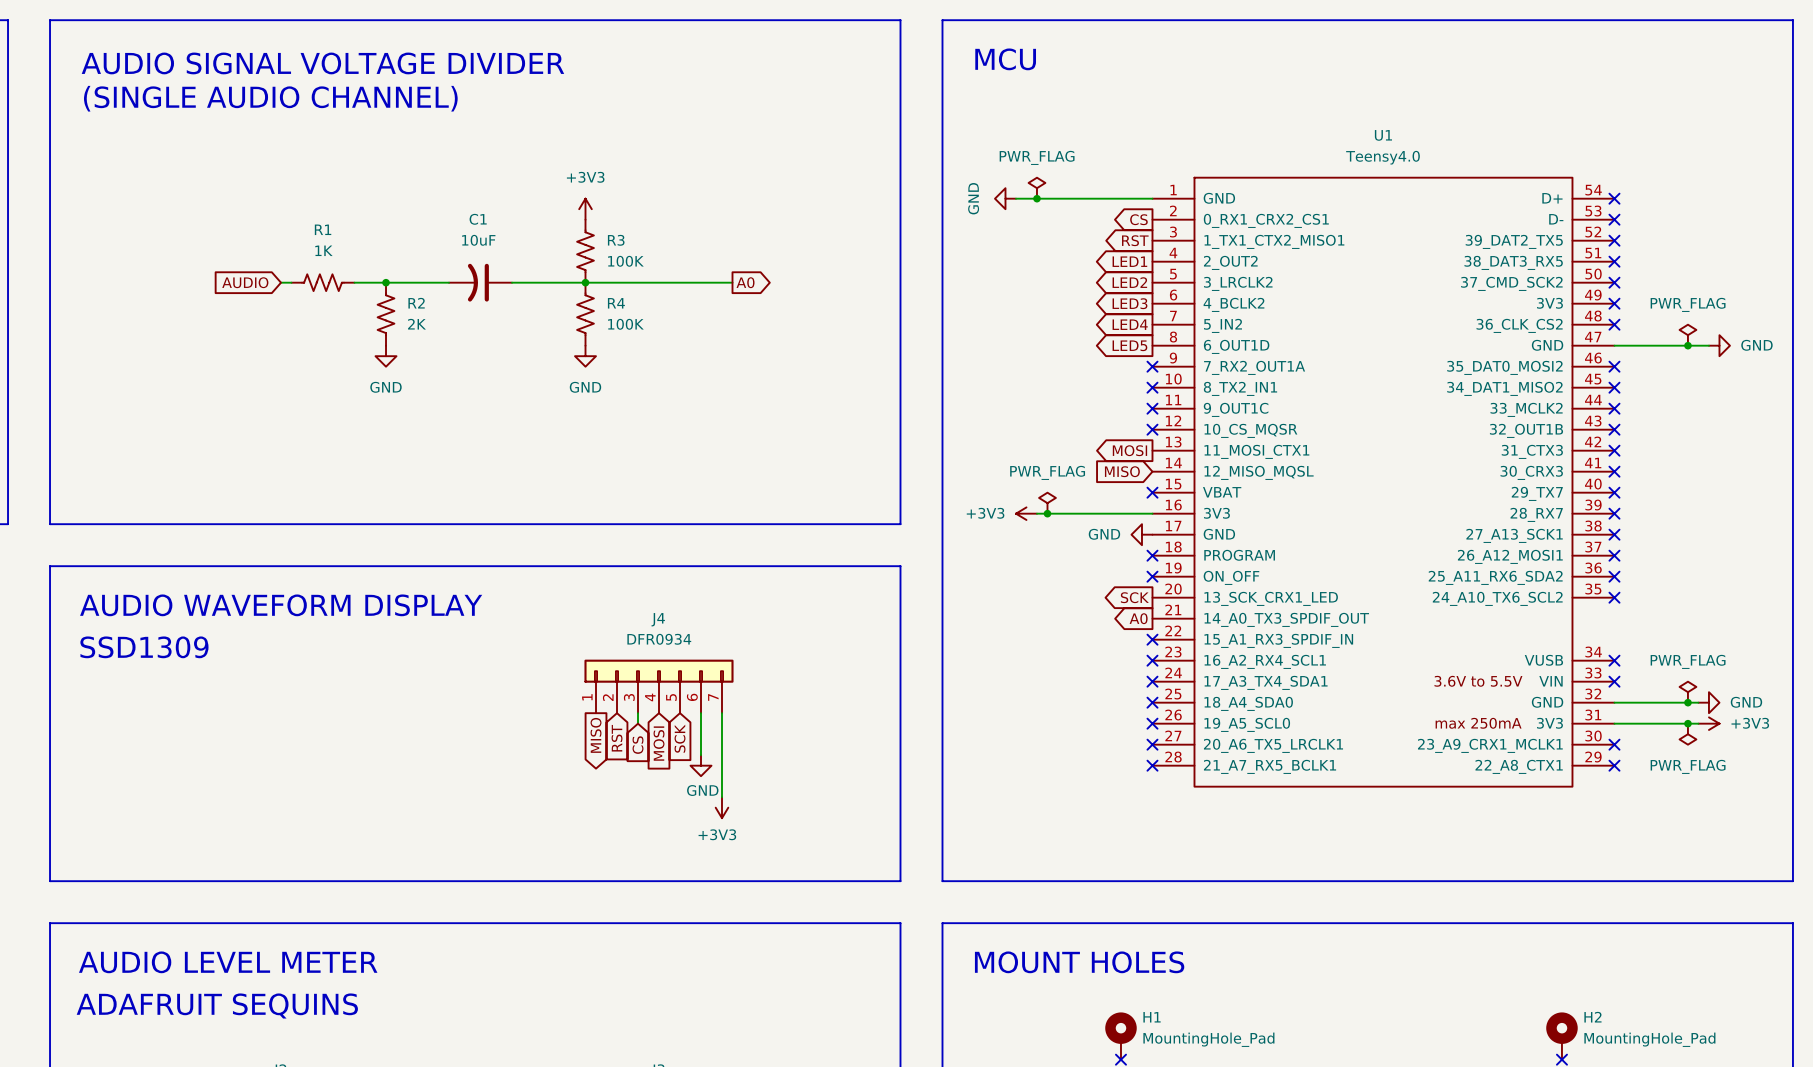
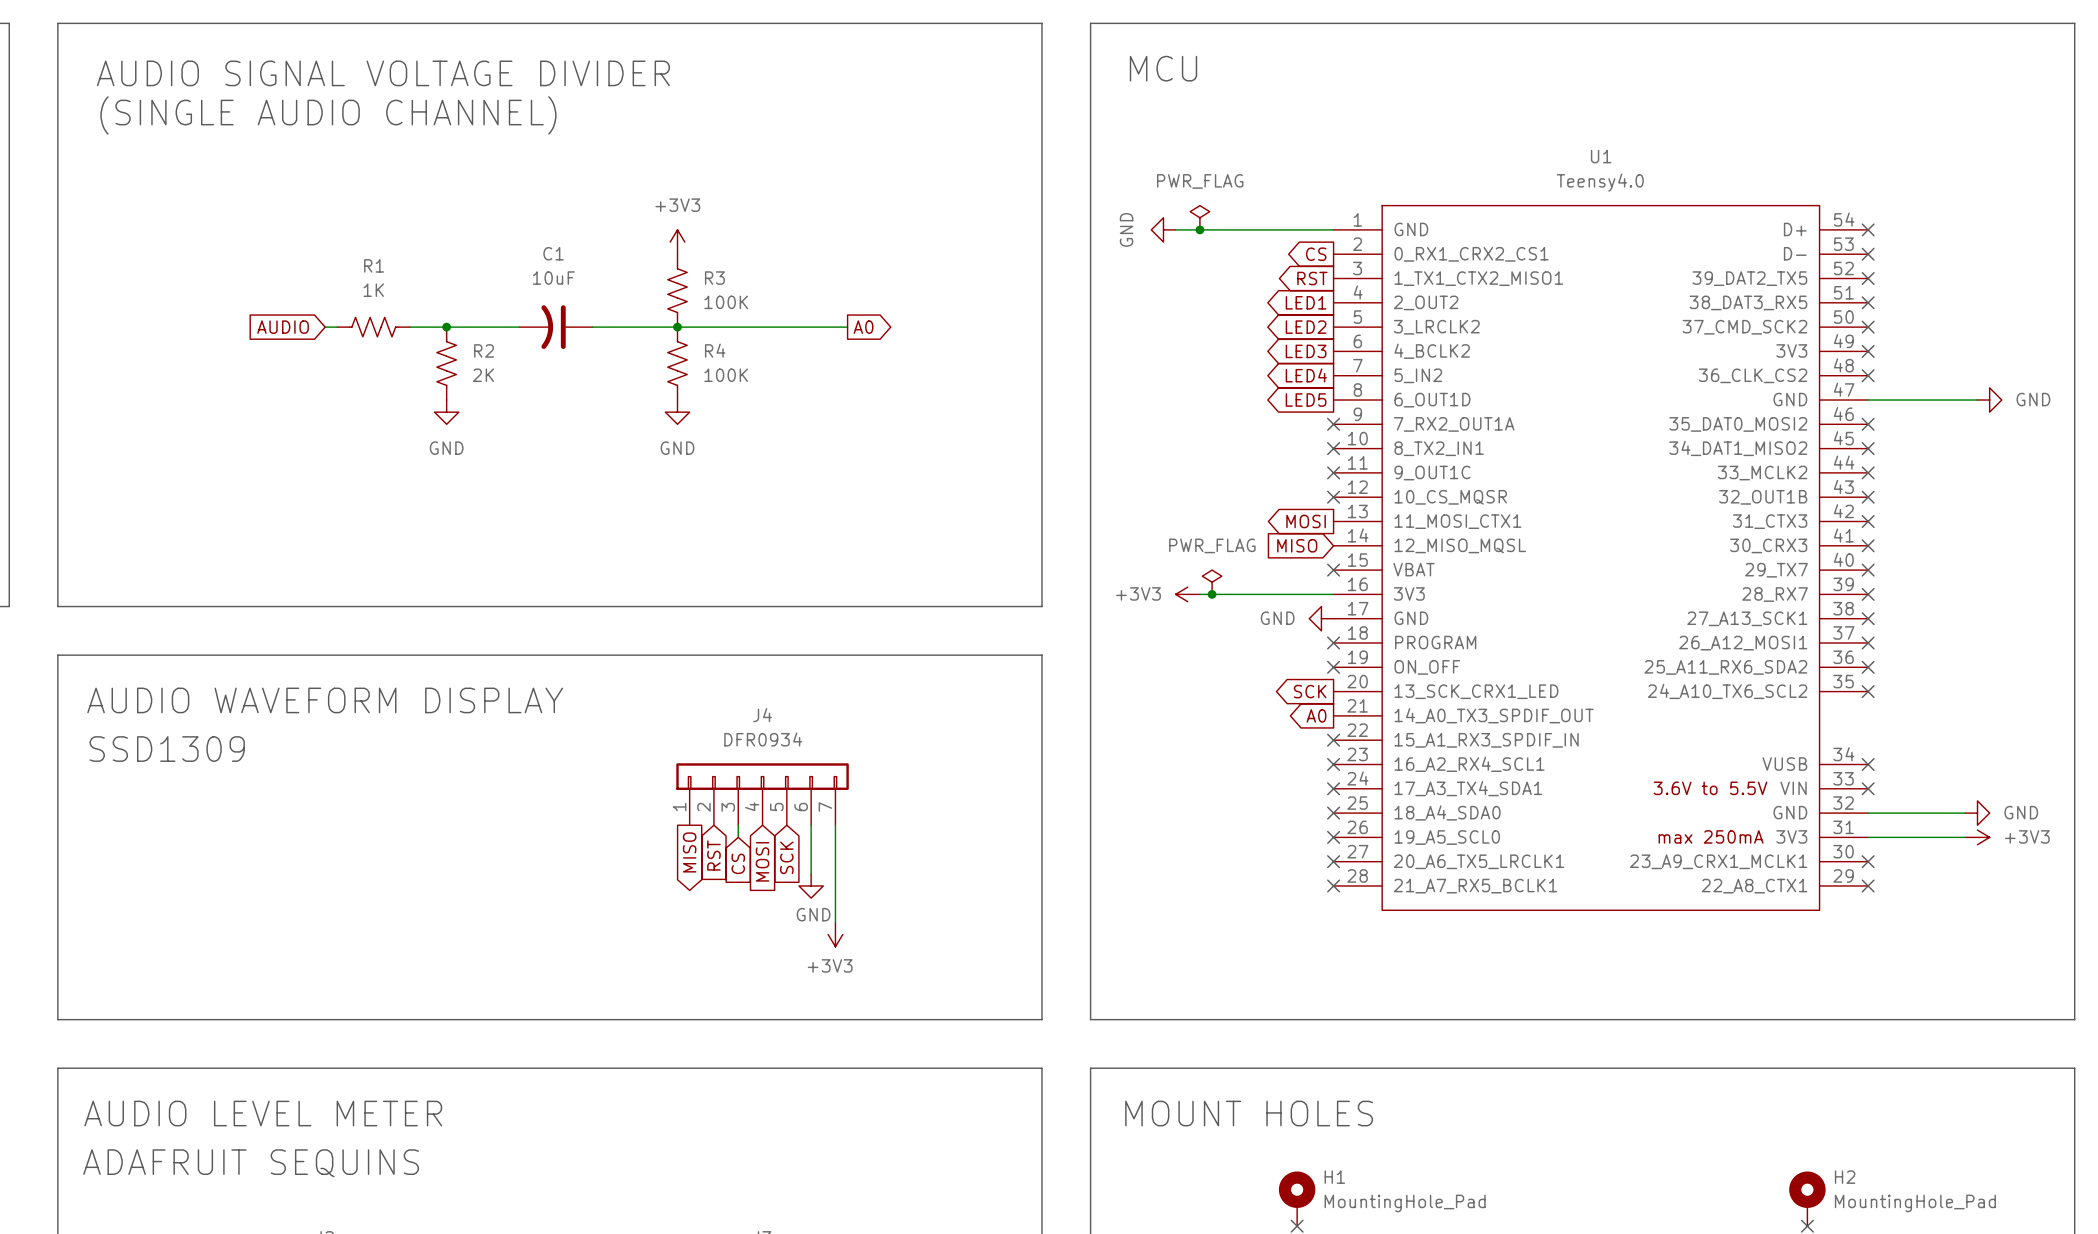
power symbol: PWR_FLAG (1687, 335) -> none
junction: (1687, 345) -> none
power symbol: PWR_FLAG (1687, 692) -> none
junction: (1687, 702) -> none
junction: (1687, 723) -> none
power symbol: PWR_FLAG (1687, 734) -> none

